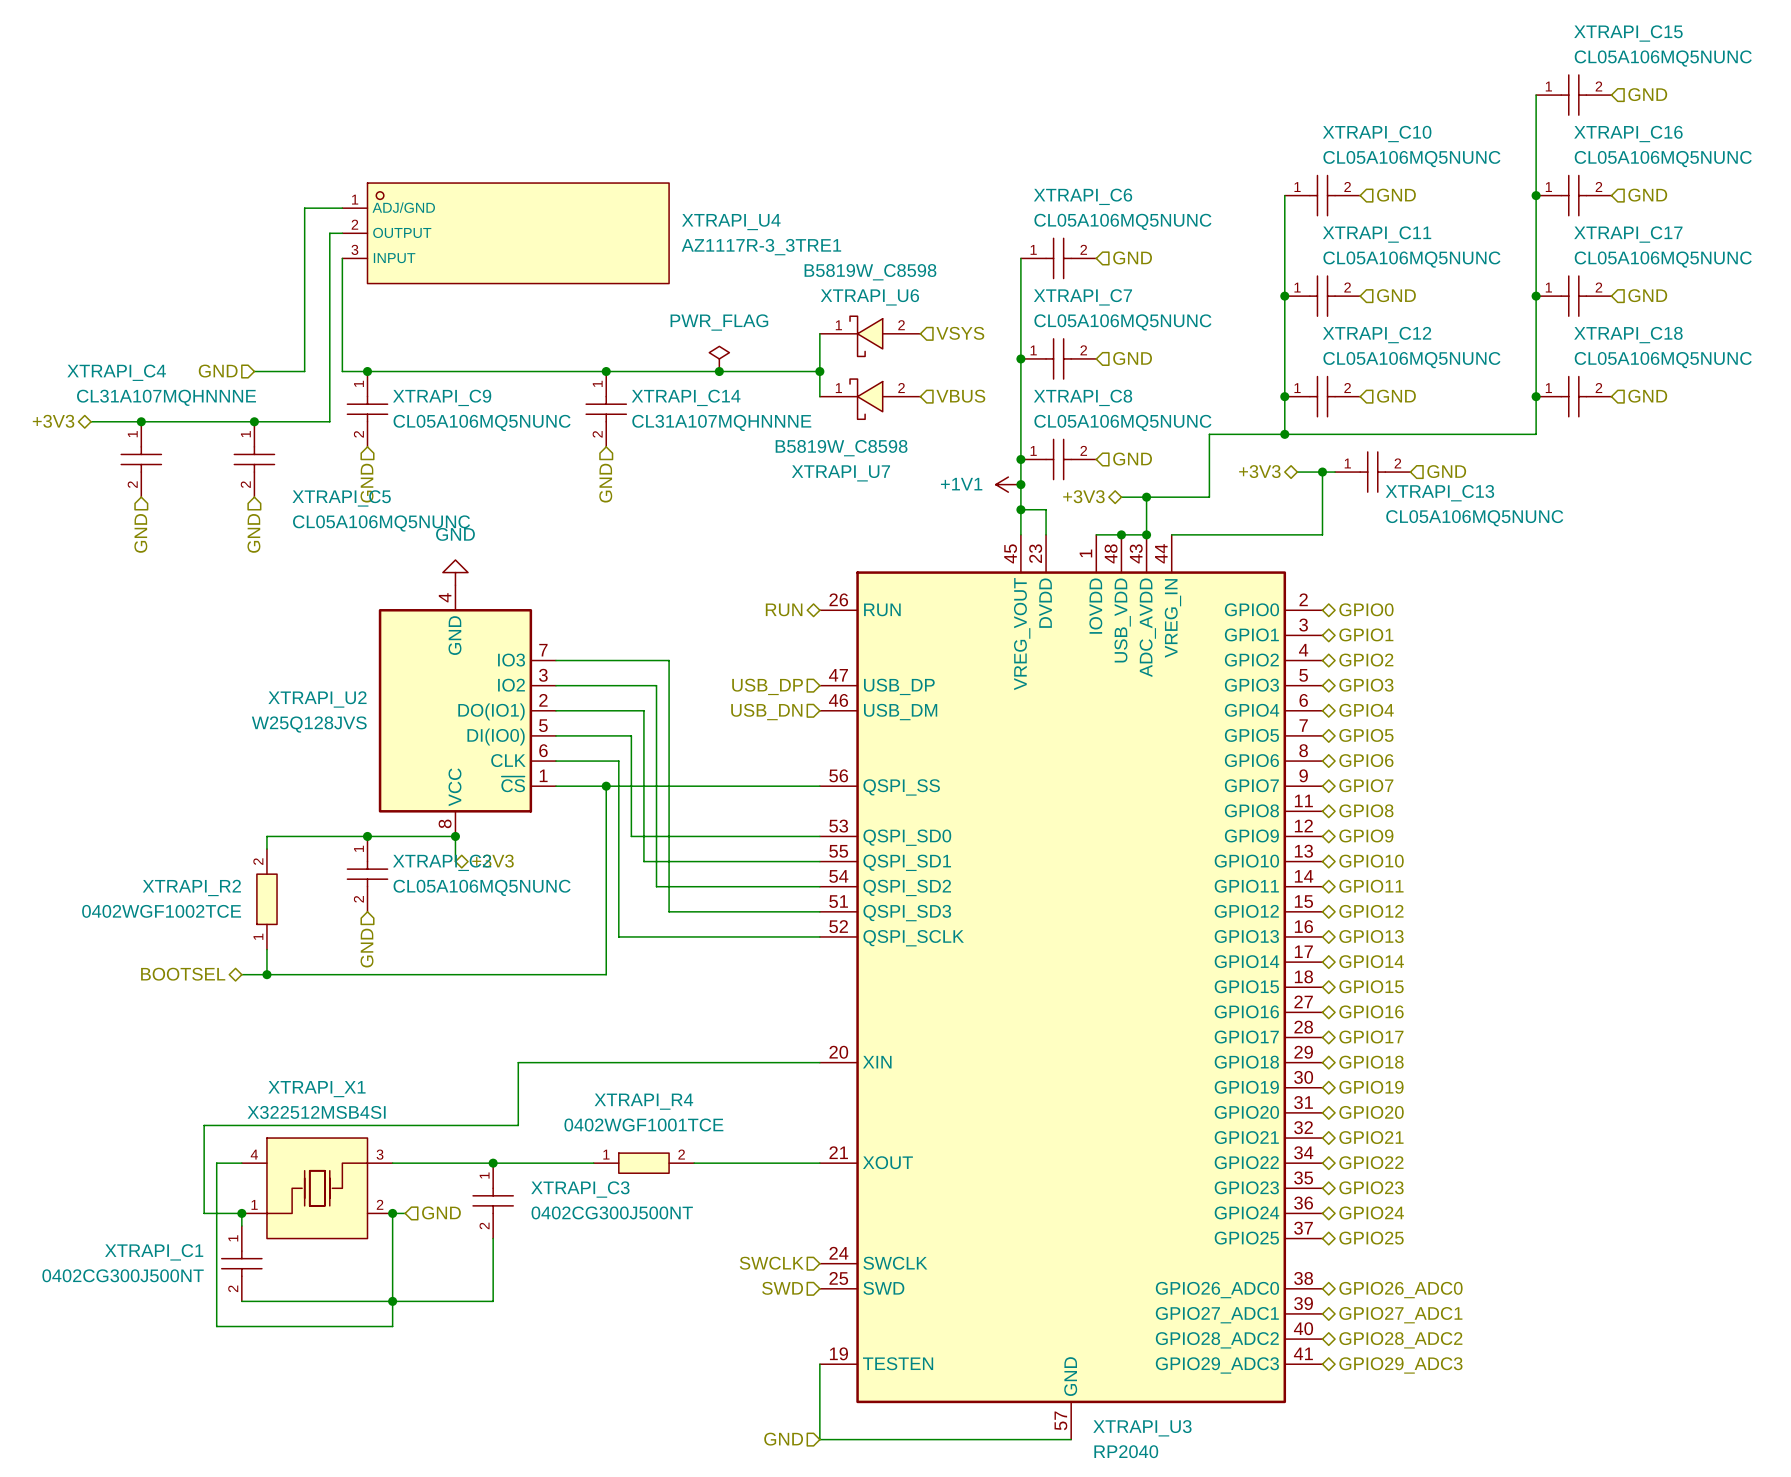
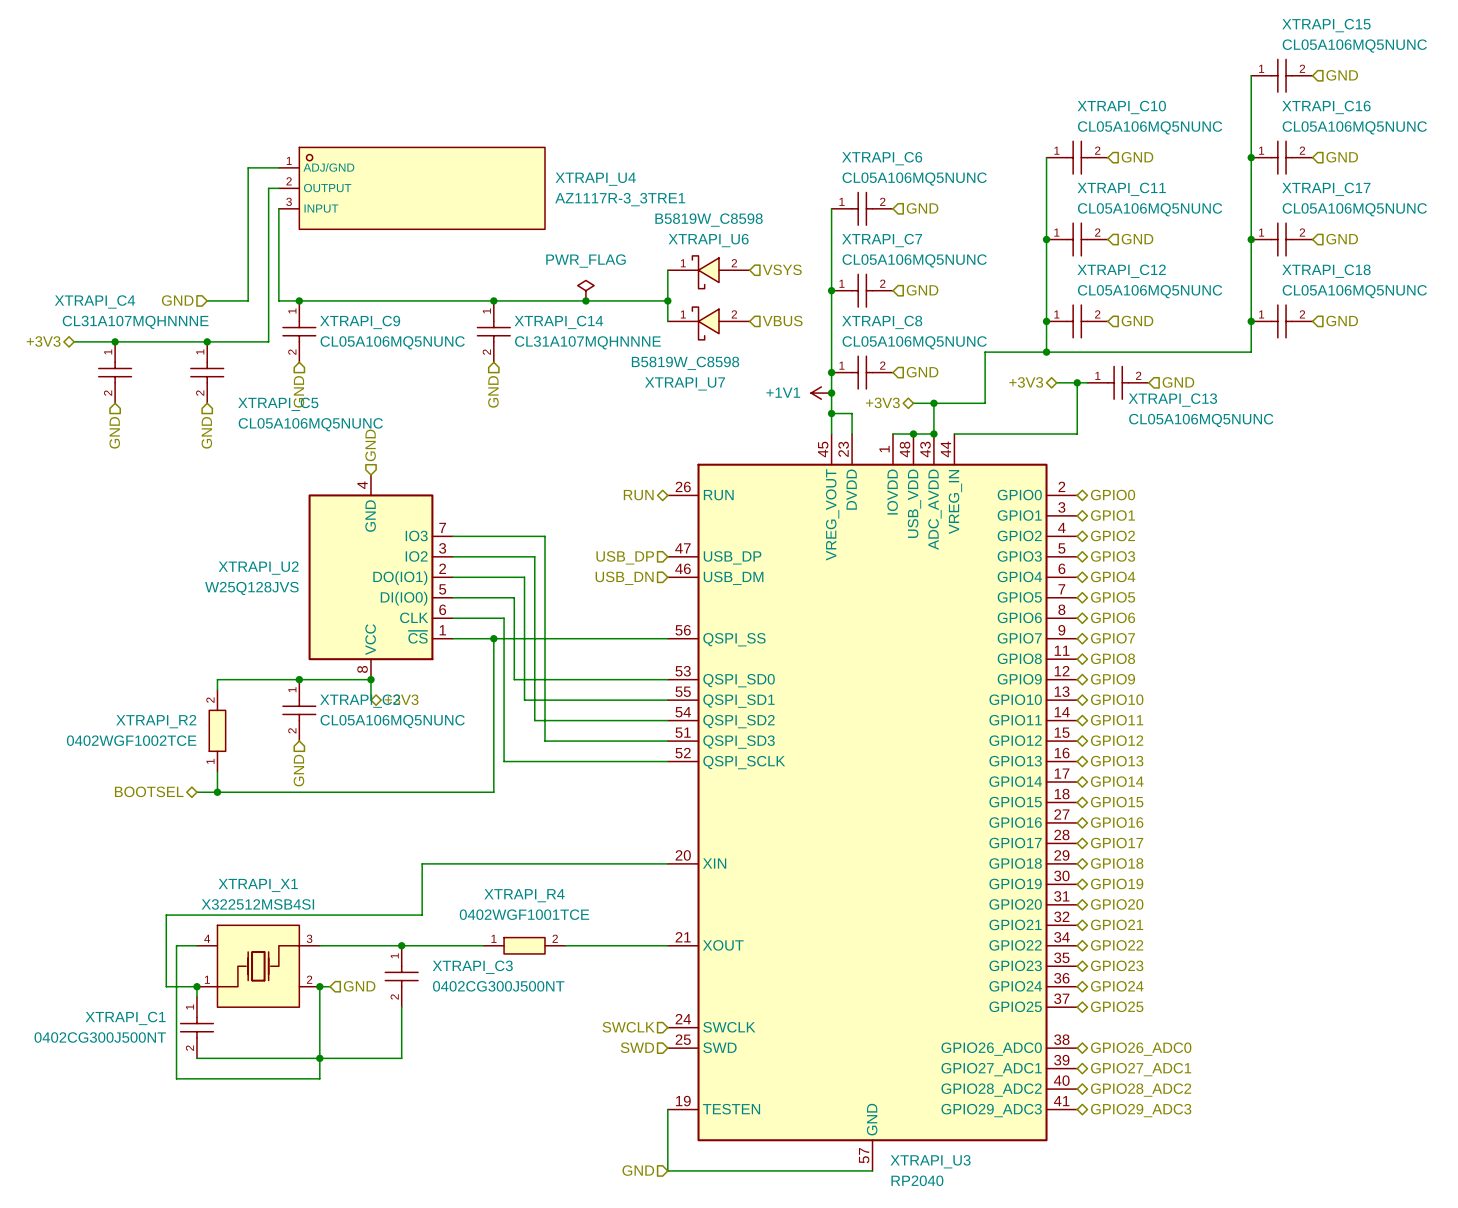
hierarchical label: none -> GND (370, 445)
power symbol: GND (455, 572) -> none

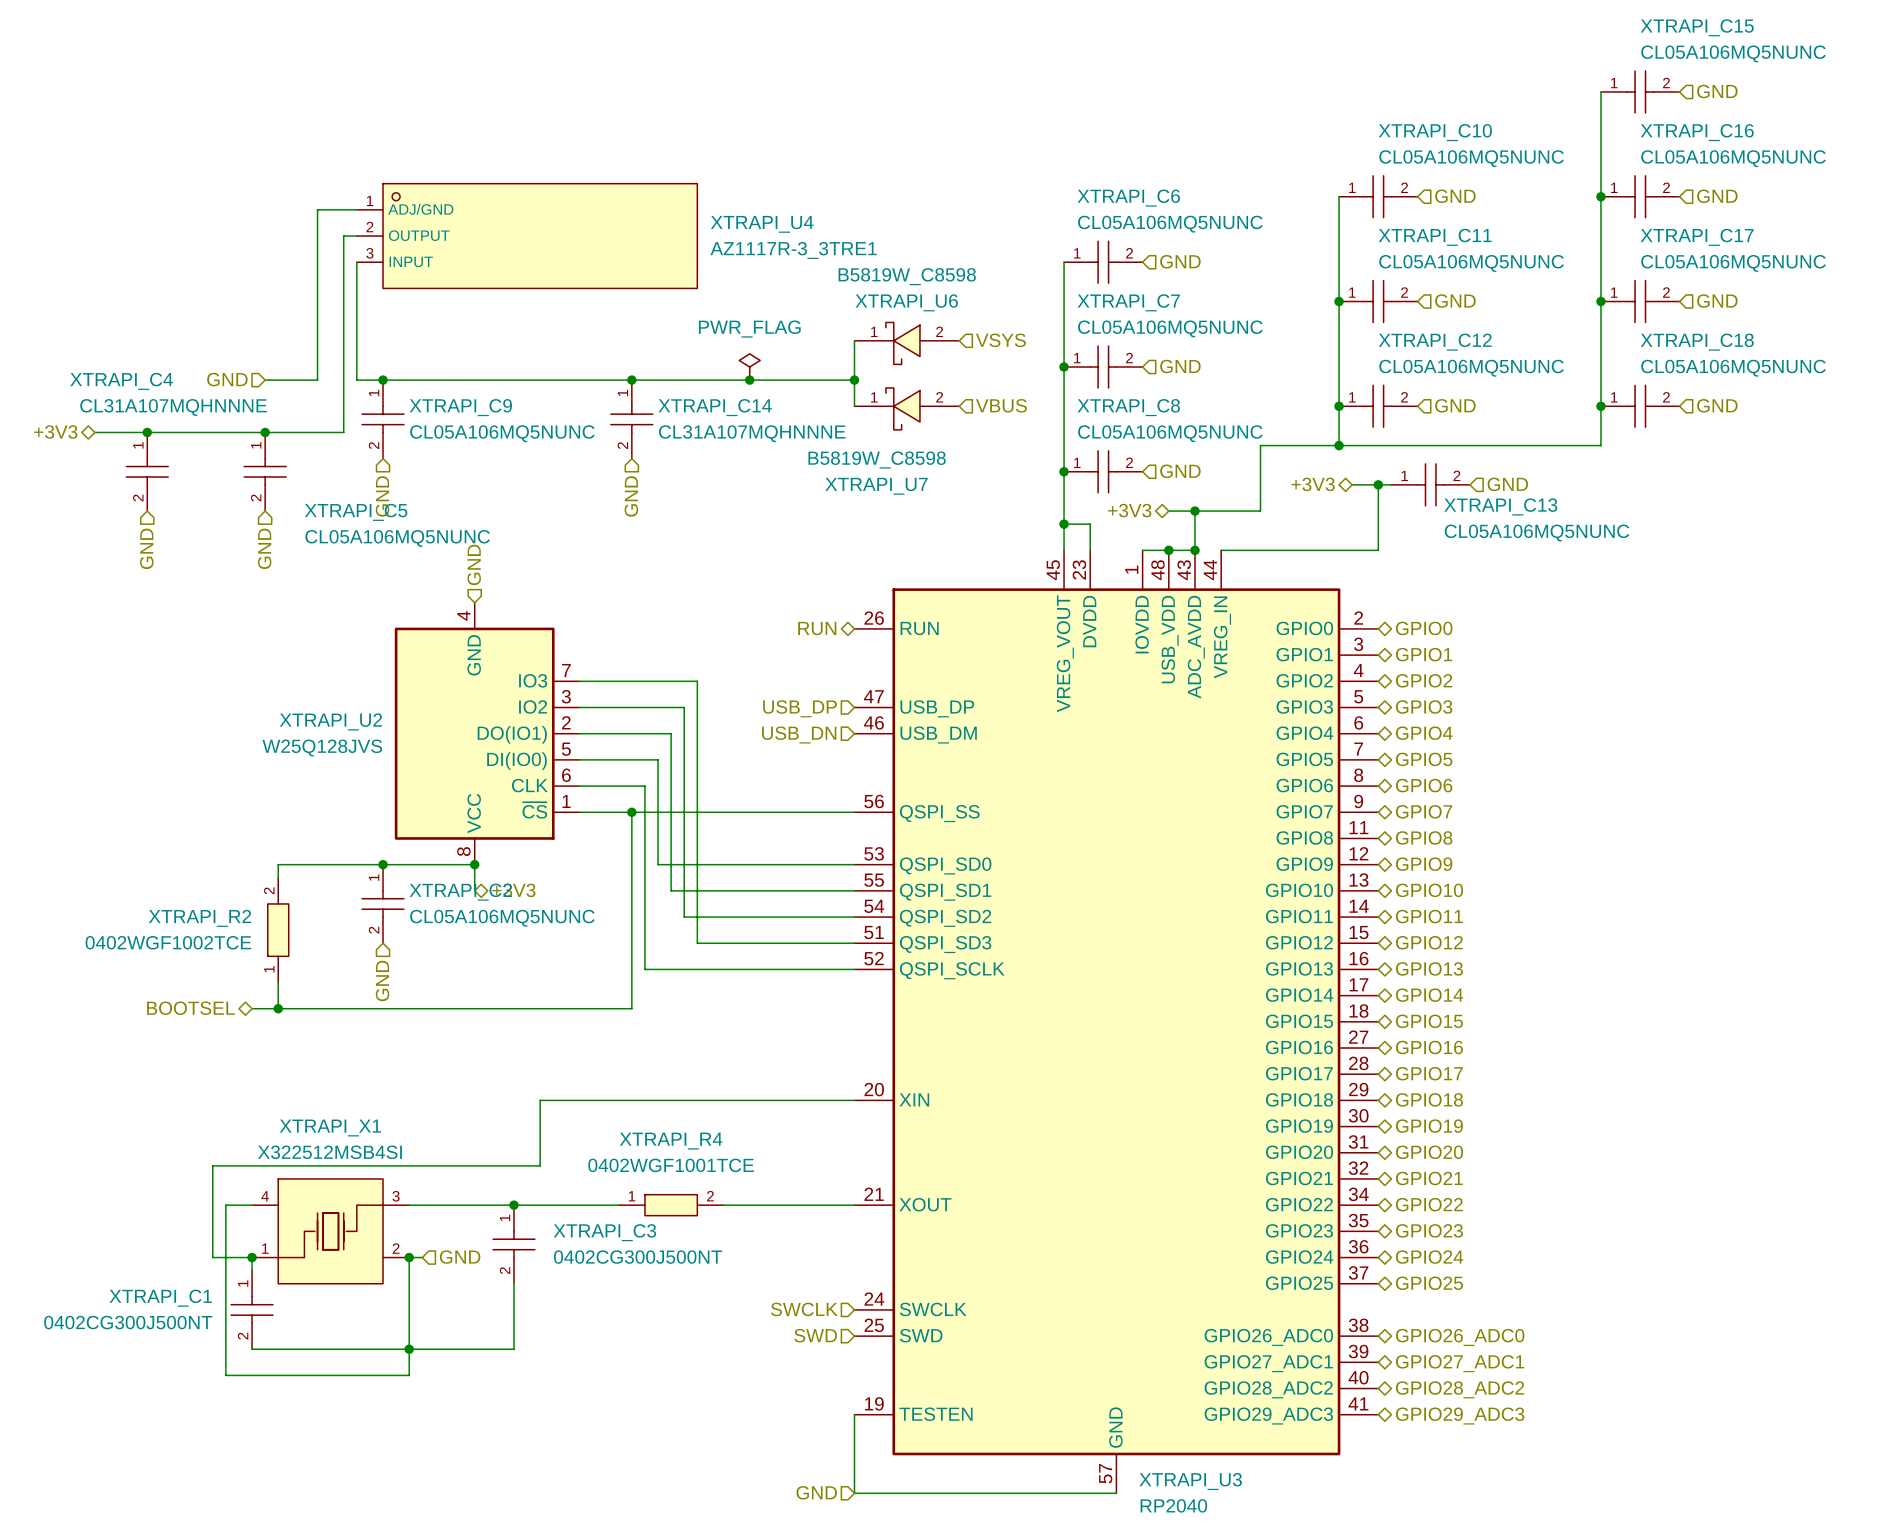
power symbol: +1V1 (821, 393) -> none
junction: (831, 393) -> none

